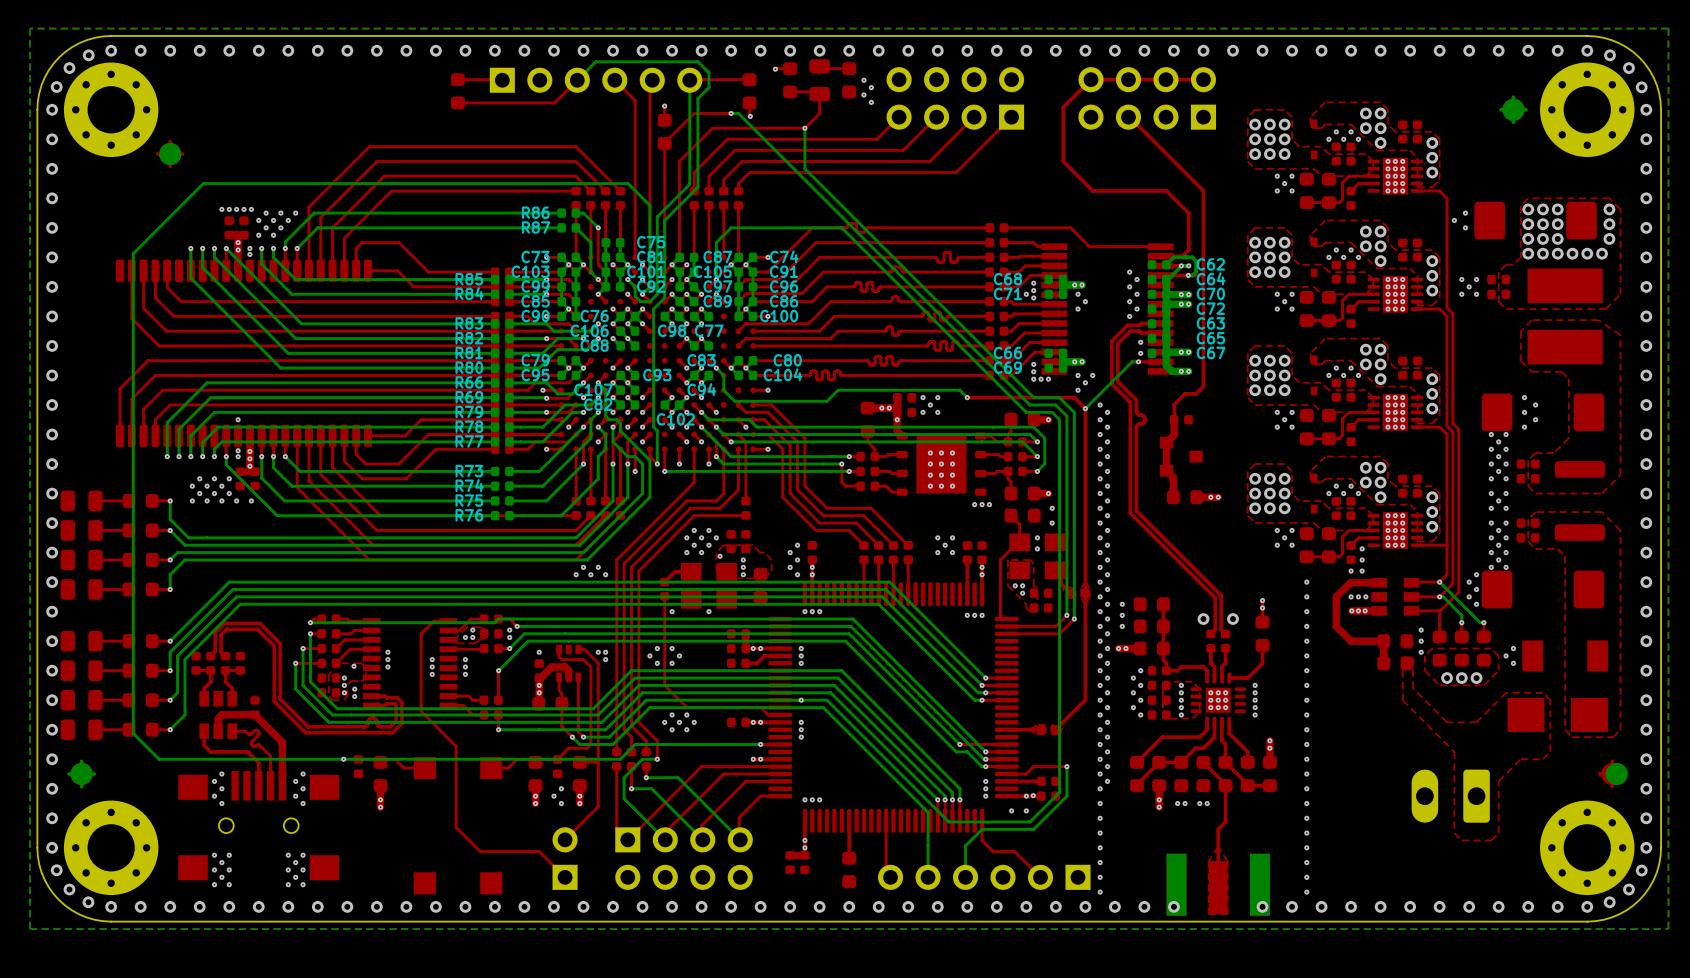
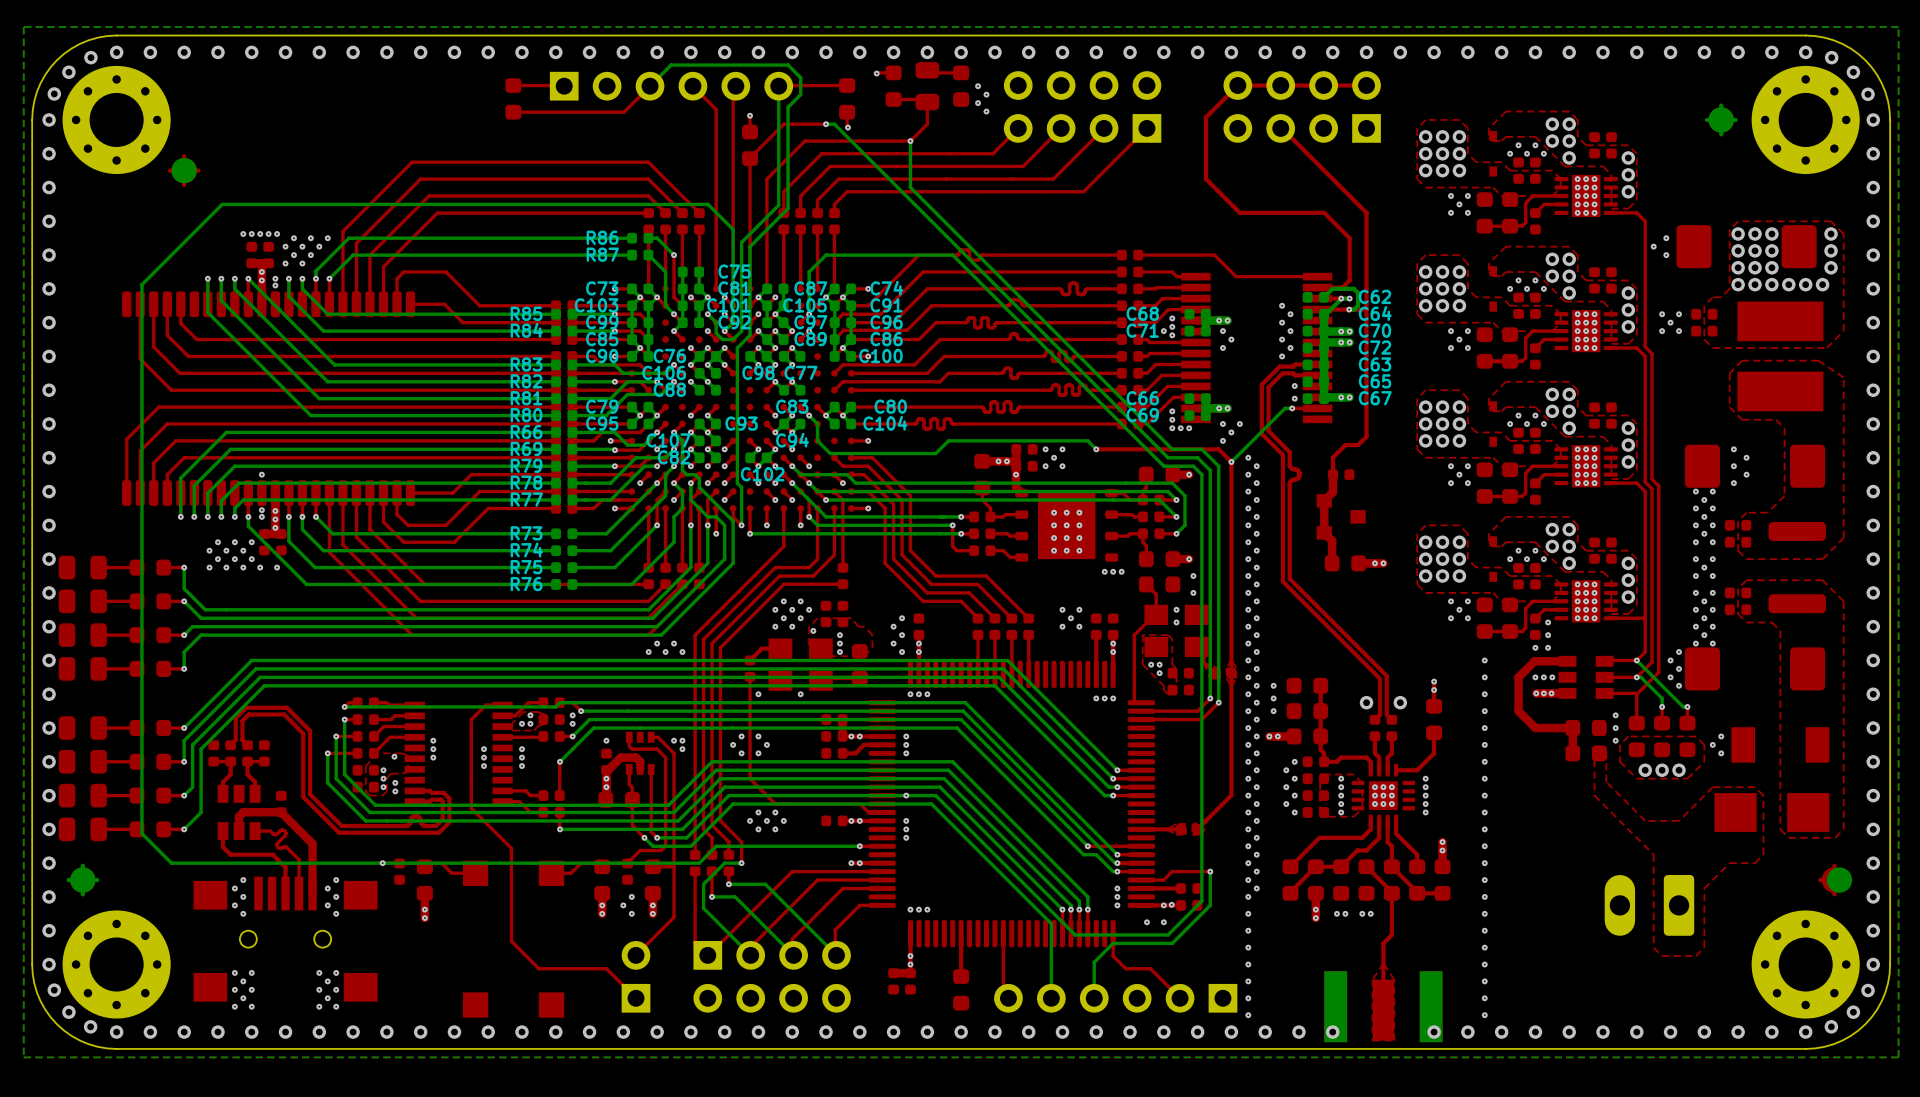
bottom track: (1166, 353) (1166, 365) (1172, 371) (1188, 371) -> none
via: (1181, 371) -> none
via: (1188, 371) -> none

